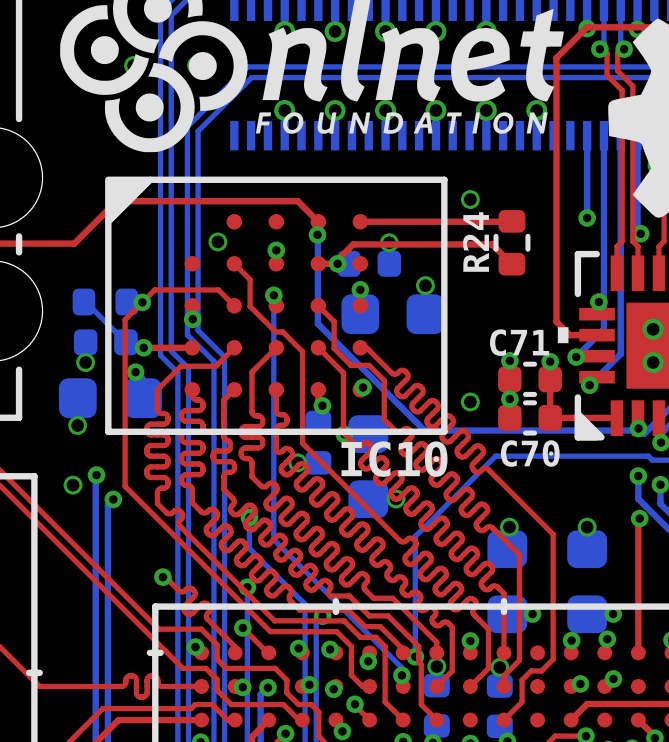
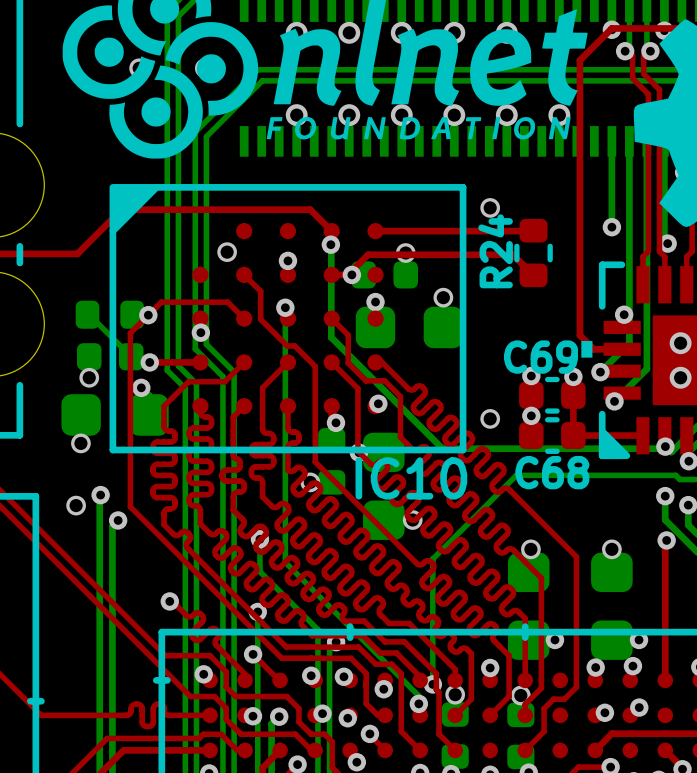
C71 name: C71 (519, 342) -> C69 (540, 357)
C70 name: C70 (530, 453) -> C68 (552, 472)

